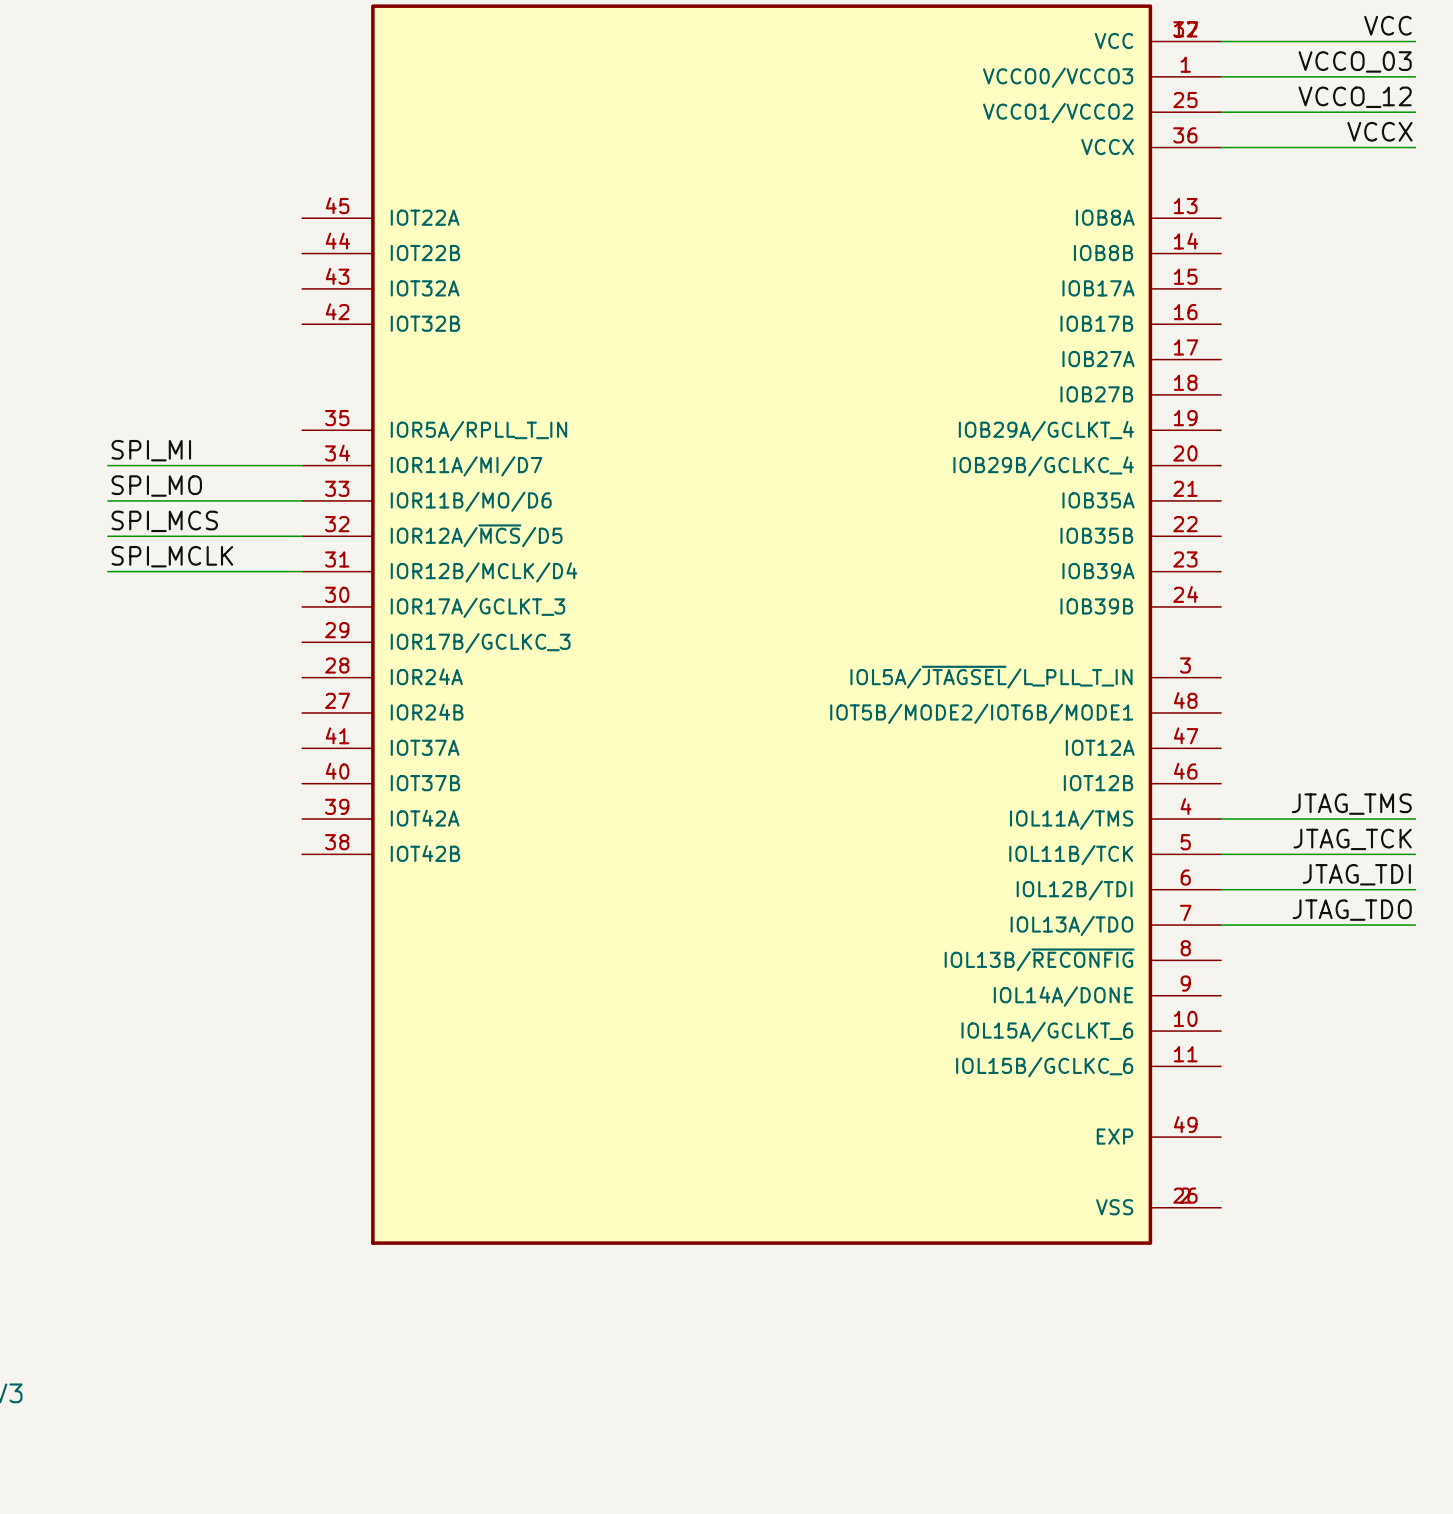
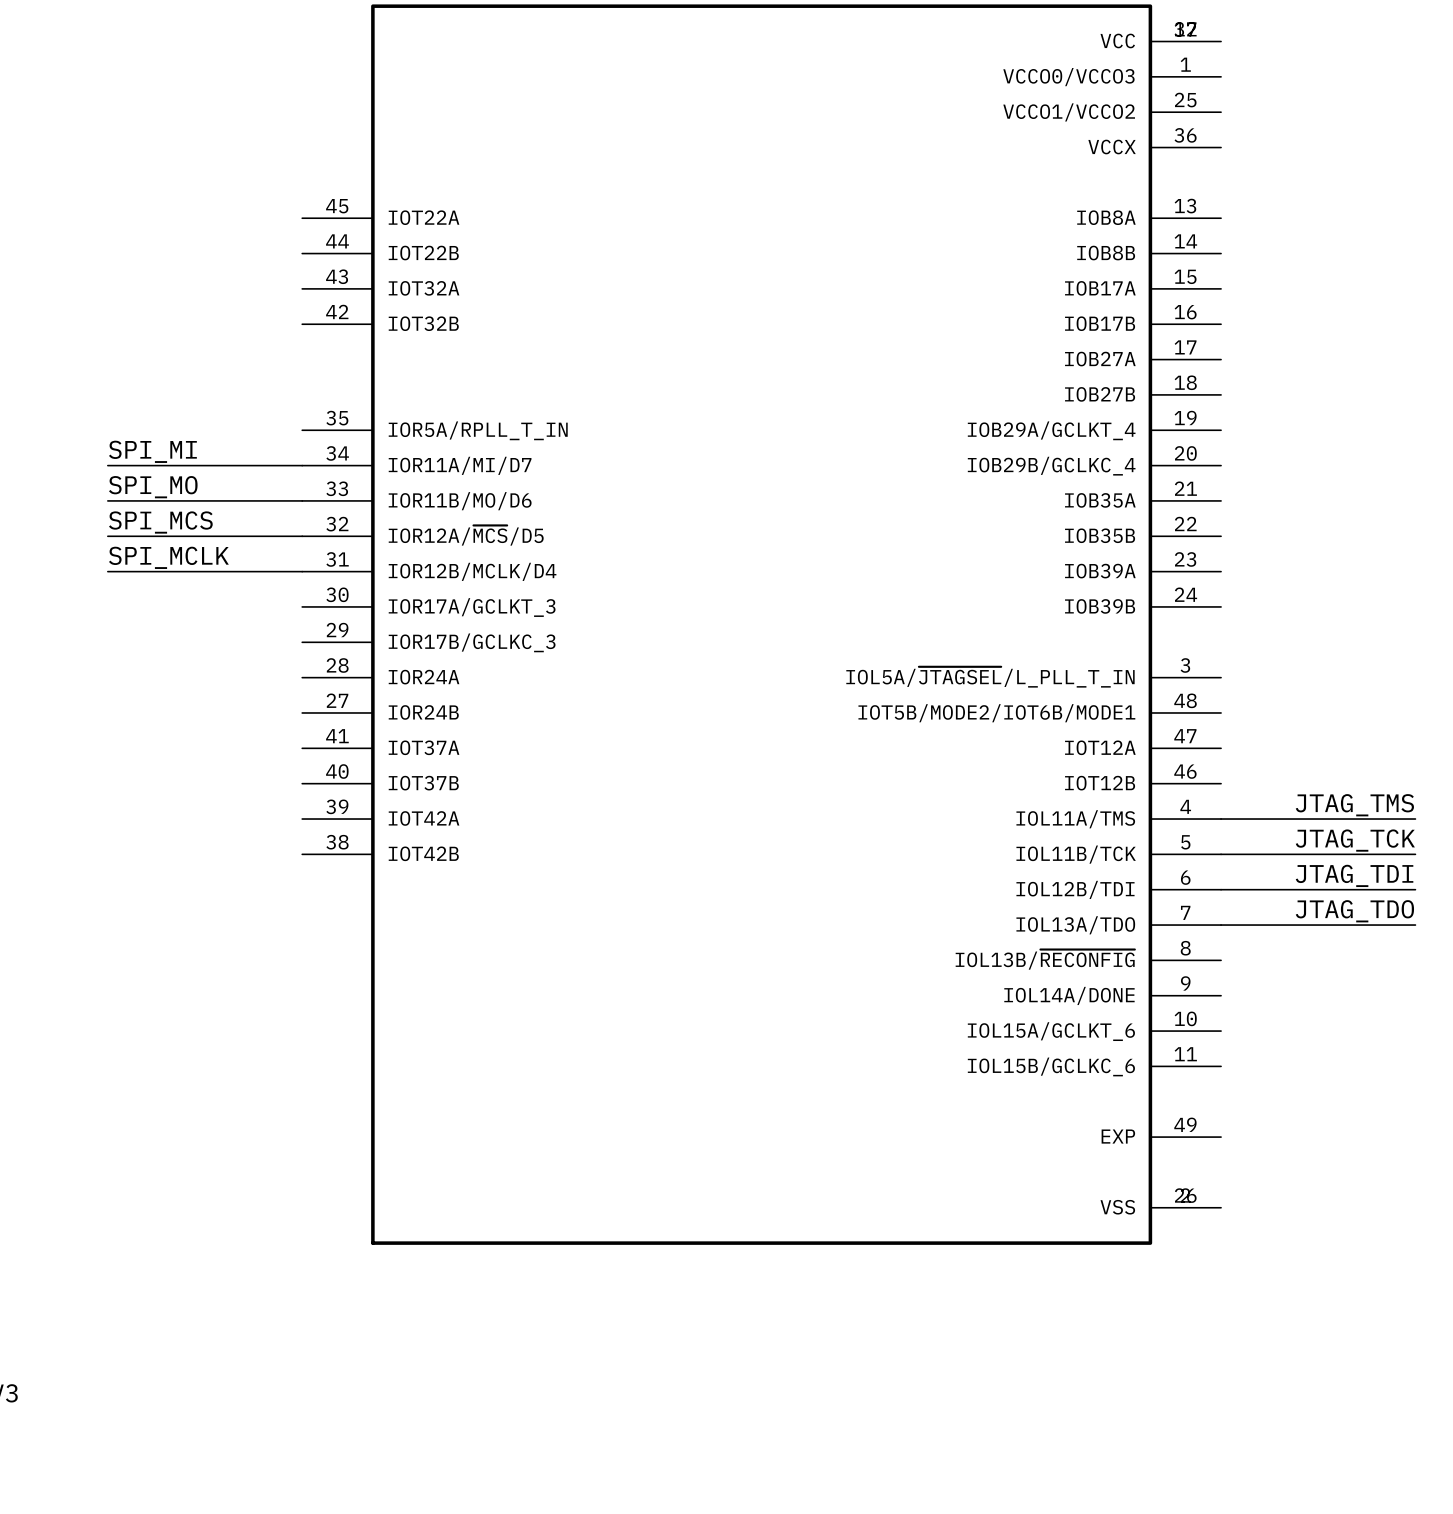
label: VCC (1387, 25) -> none
wire: (1221, 41) (1415, 41) -> none
label: VCCO_03 (1355, 61) -> none
wire: (1221, 76) (1415, 76) -> none
label: VCCO_12 (1355, 97) -> none
wire: (1221, 112) (1415, 112) -> none
label: VCCX (1379, 131) -> none
wire: (1221, 147) (1415, 147) -> none

